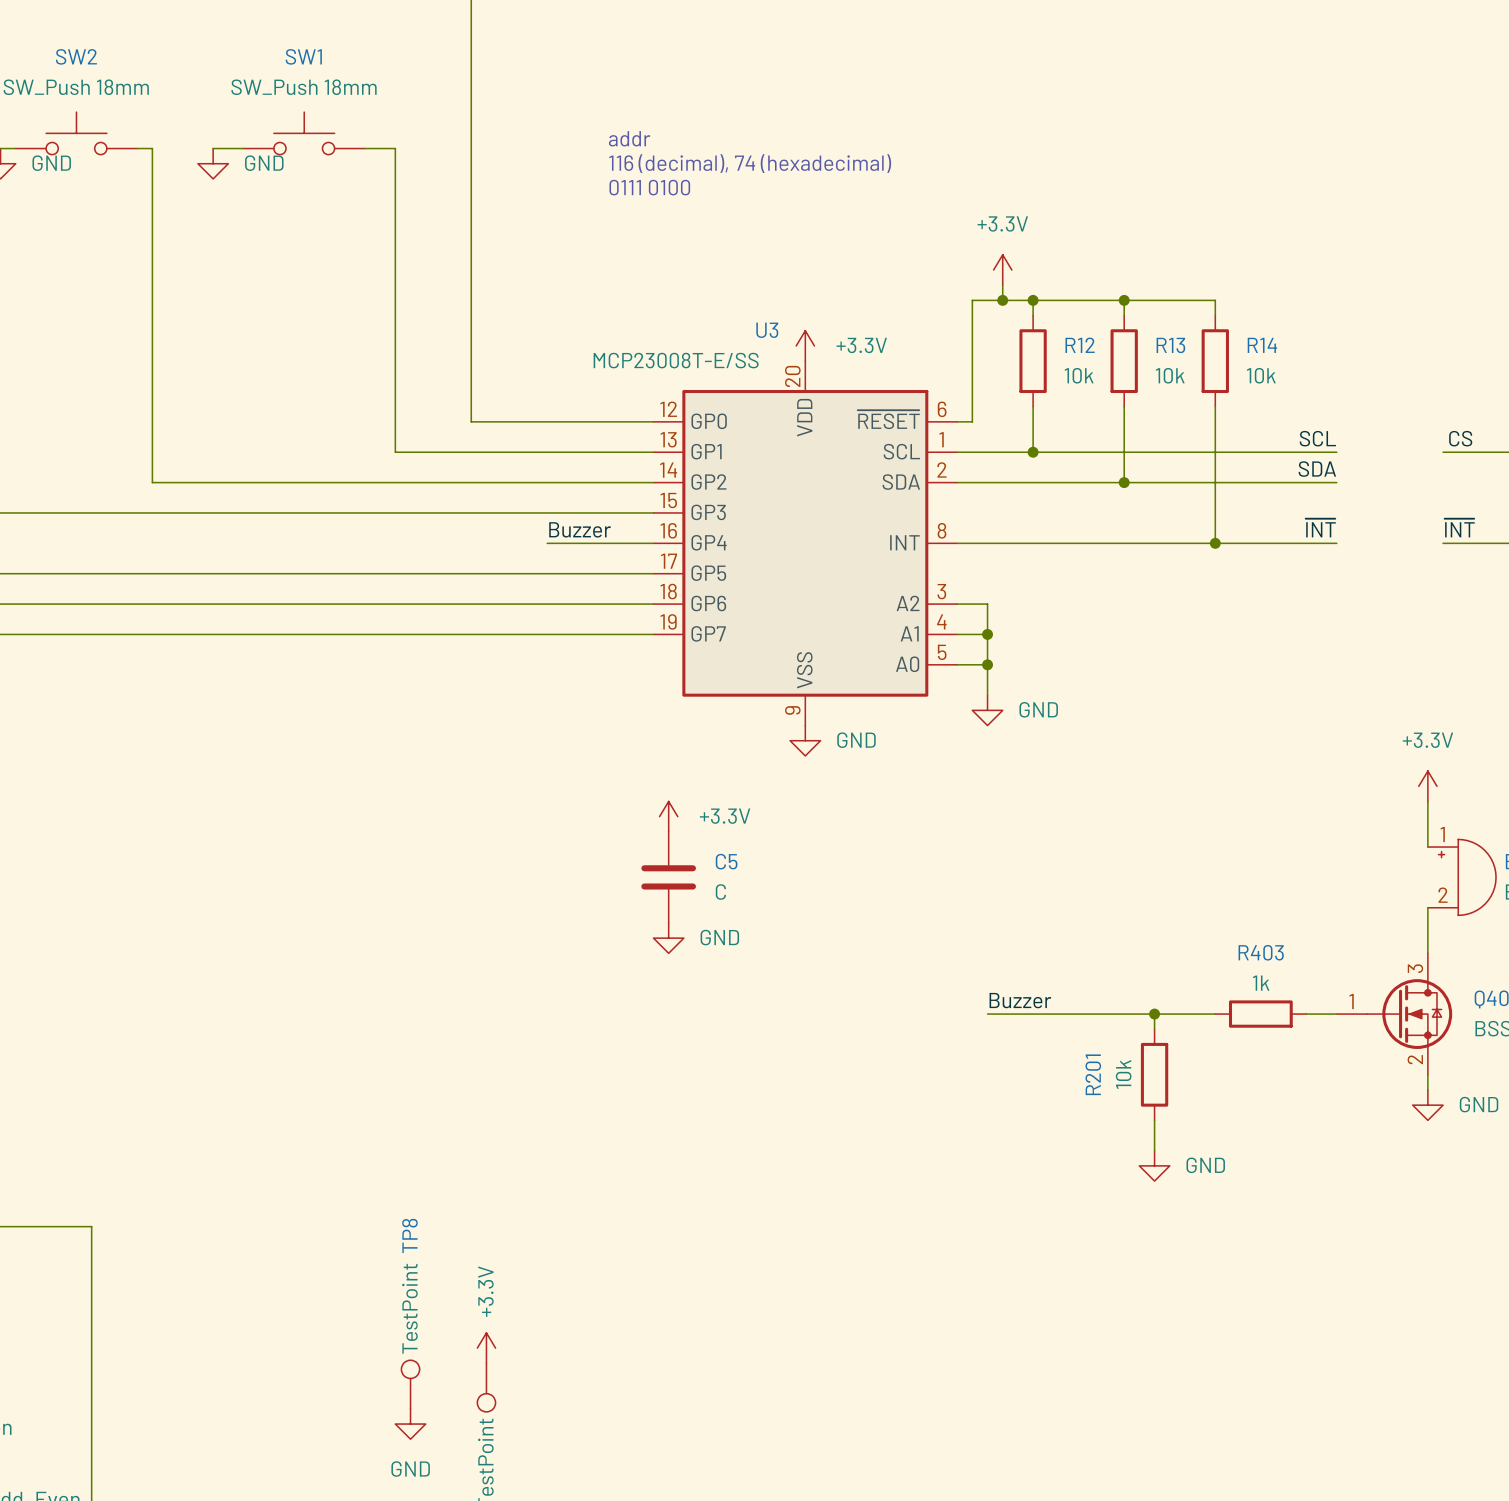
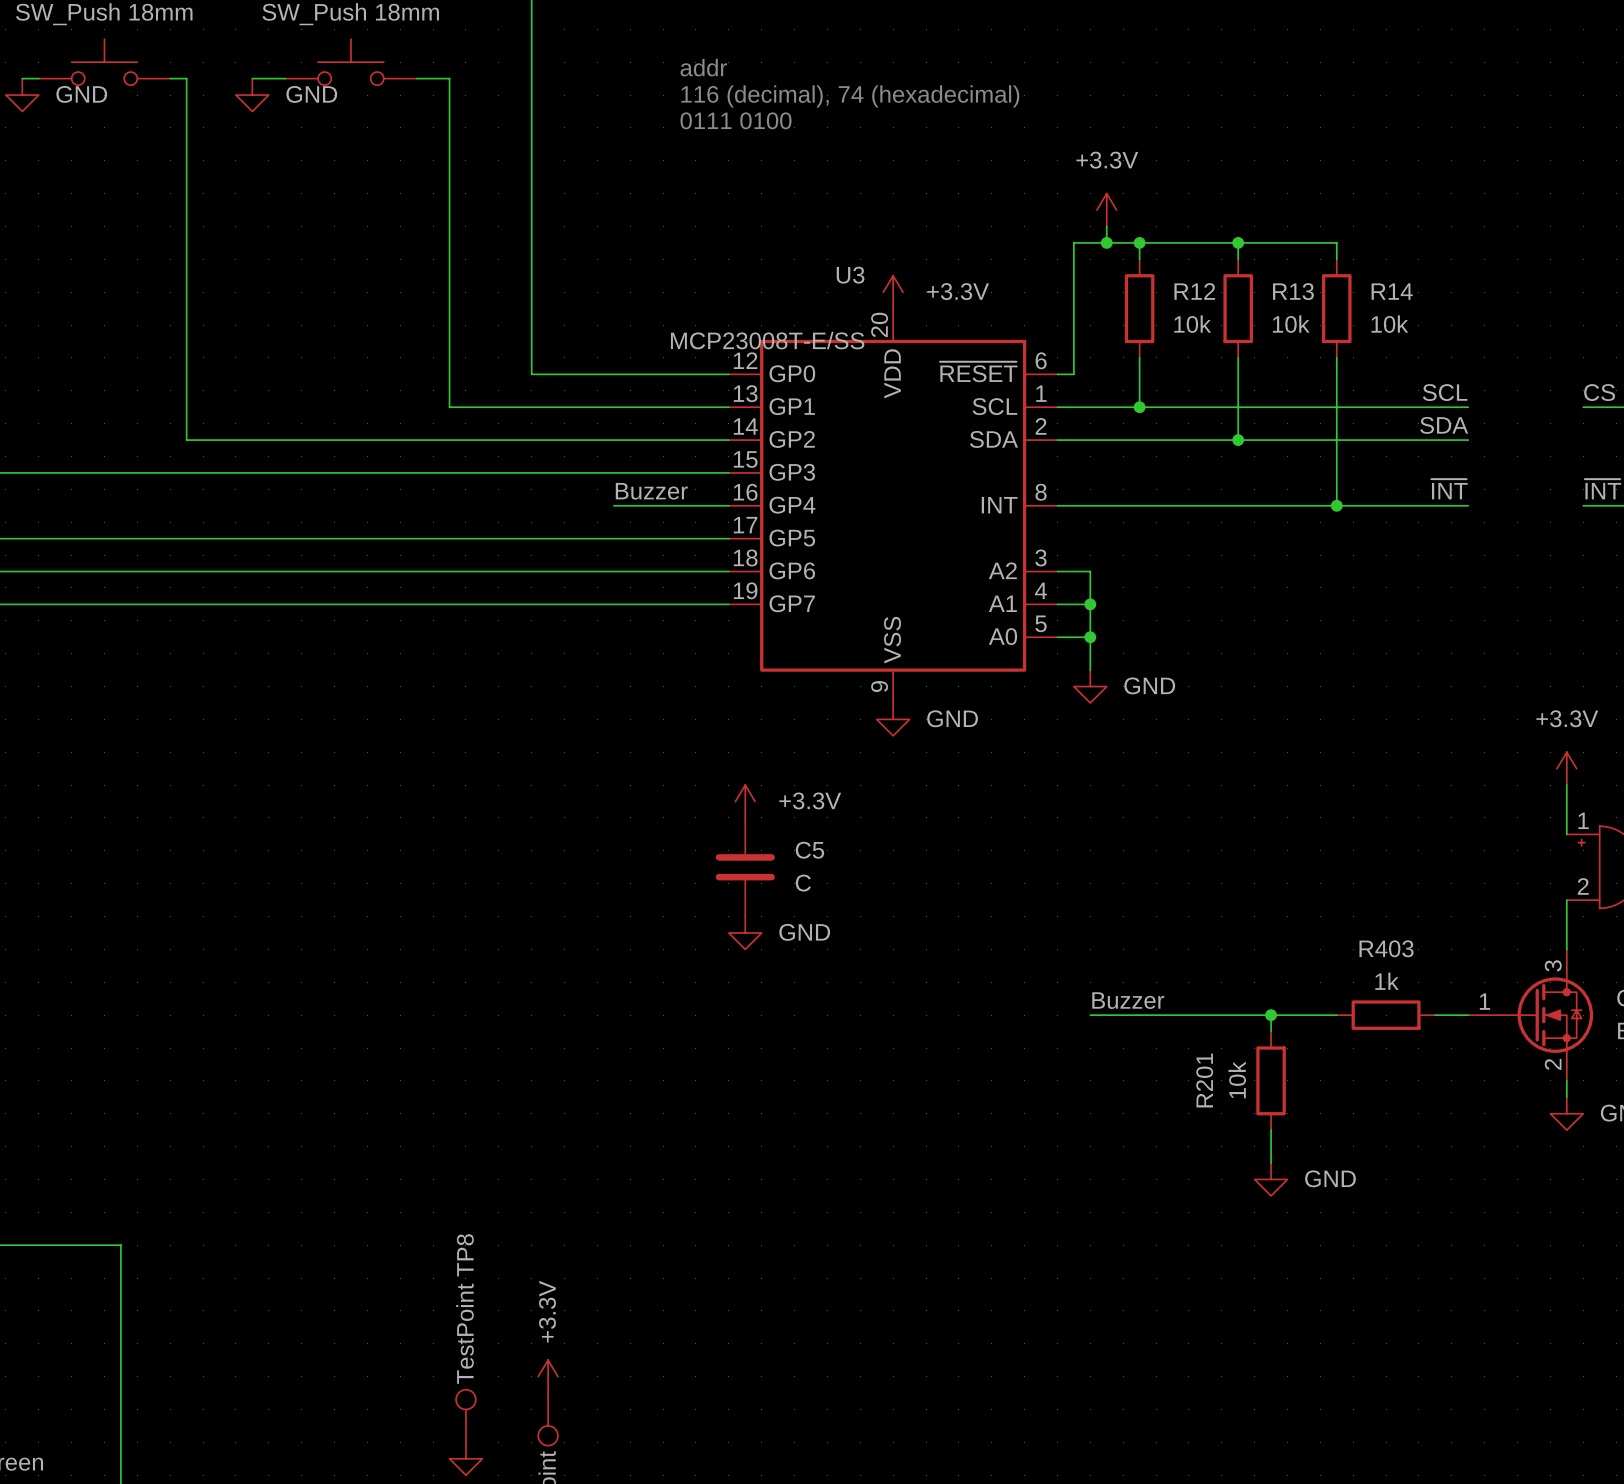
U3 value position: MCP23008T-E/SS (676, 360) -> MCP23008T-E/SS (767, 340)

